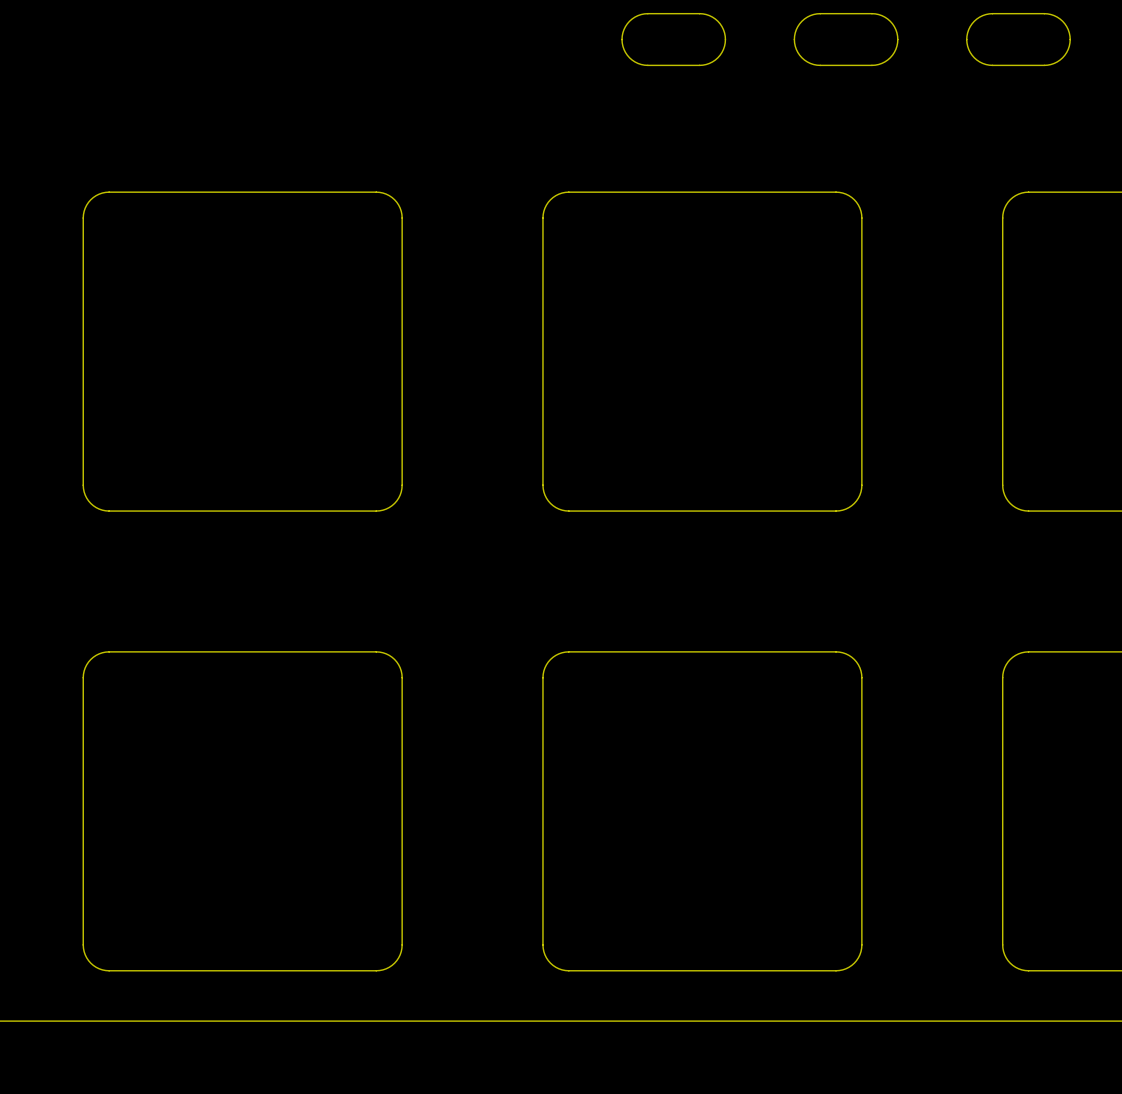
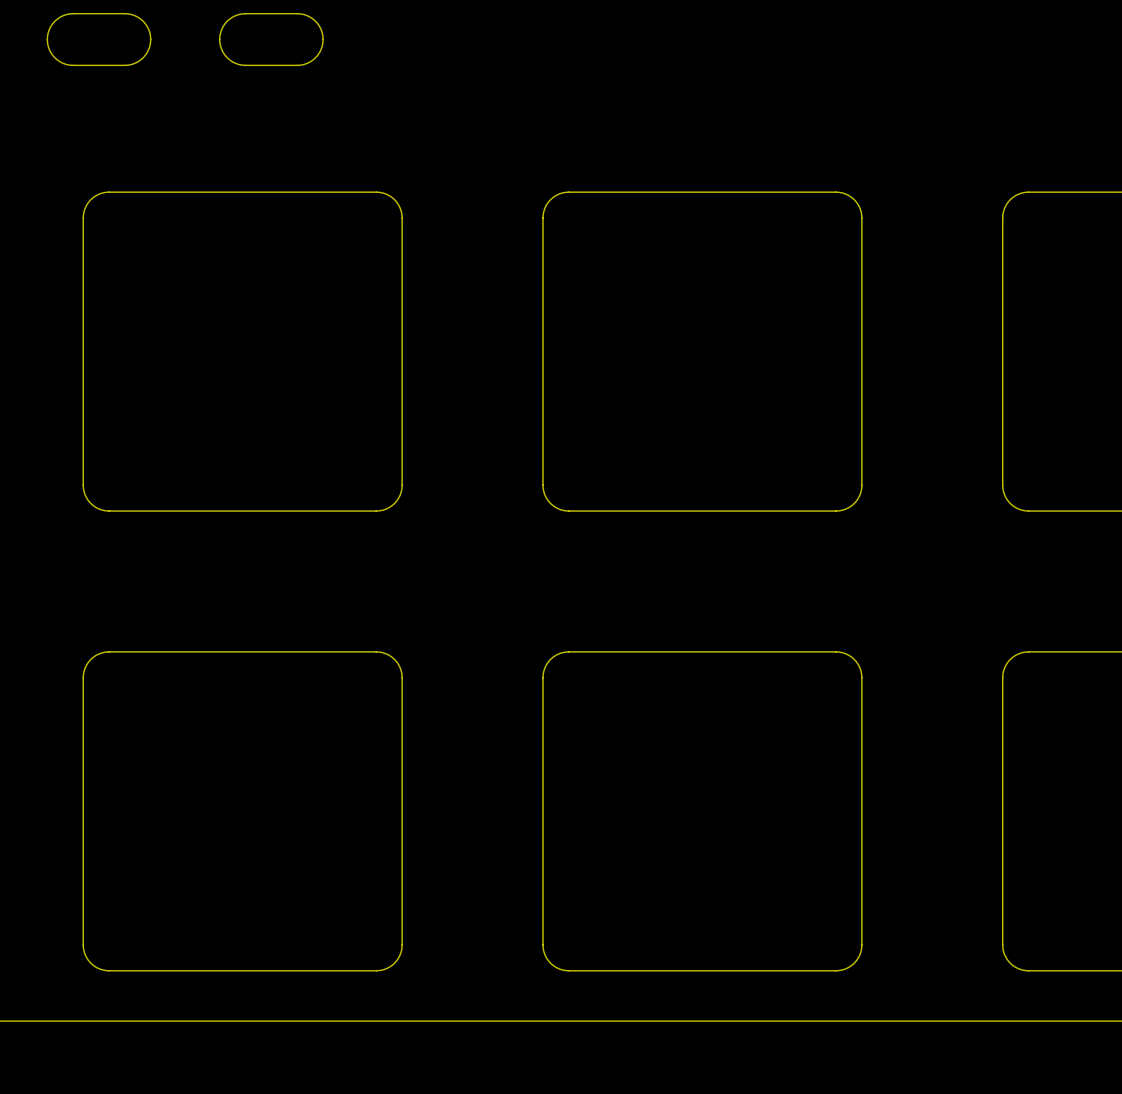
board edge: none -> (73, 13) (124, 13) (137, 17) (145, 23) (149, 32) (150, 42) (147, 52) (140, 60) (128, 65) (73, 65) (60, 61) (49, 49) (48, 32) (57, 19) (73, 13)
board edge: (647, 13) (699, 13) (712, 17) (720, 23) (724, 32) (725, 42) (721, 52) (715, 60) (702, 65) (647, 65) (634, 61) (623, 49) (622, 32) (632, 19) (647, 13) -> (245, 13) (297, 13) (310, 17) (317, 23) (322, 32) (322, 42) (319, 52) (313, 60) (300, 65) (245, 65) (232, 61) (221, 49) (220, 32) (229, 19) (245, 13)
board edge: (820, 13) (871, 13) (884, 17) (892, 23) (896, 32) (897, 42) (894, 52) (884, 61) (875, 65) (820, 65) (807, 61) (796, 49) (795, 32) (804, 19) (820, 13) -> none
board edge: (992, 13) (1044, 13) (1057, 17) (1064, 23) (1069, 32) (1069, 42) (1066, 52) (1057, 61) (1047, 65) (992, 65) (979, 61) (968, 49) (967, 32) (976, 19) (992, 13) -> none

